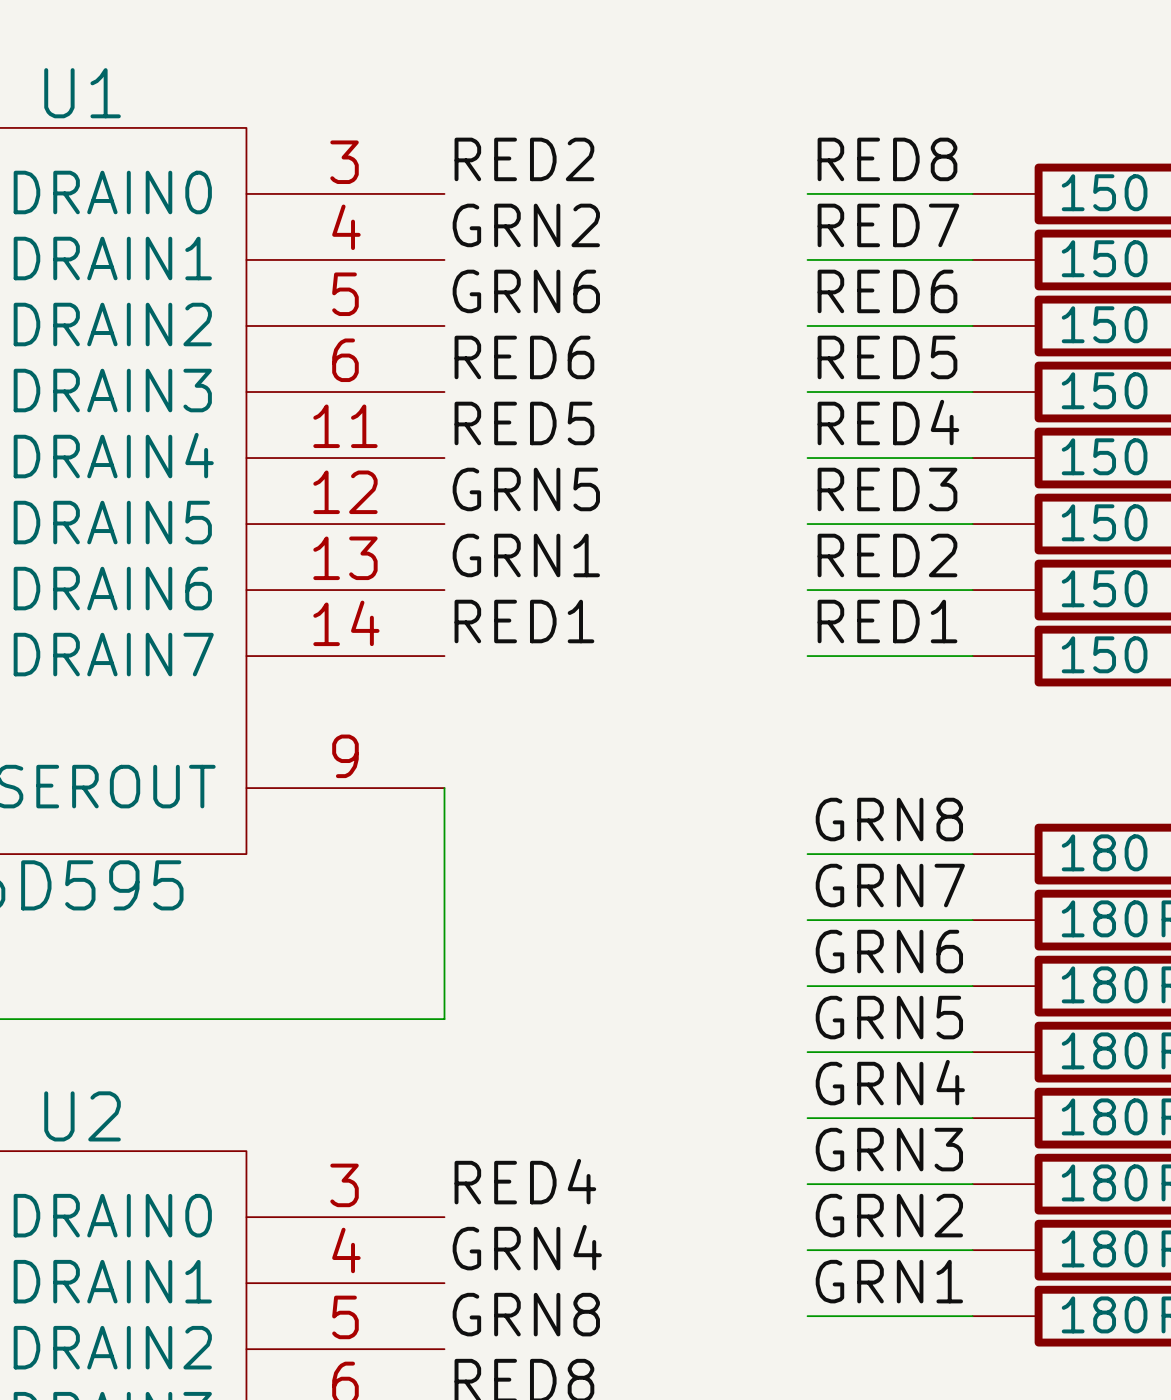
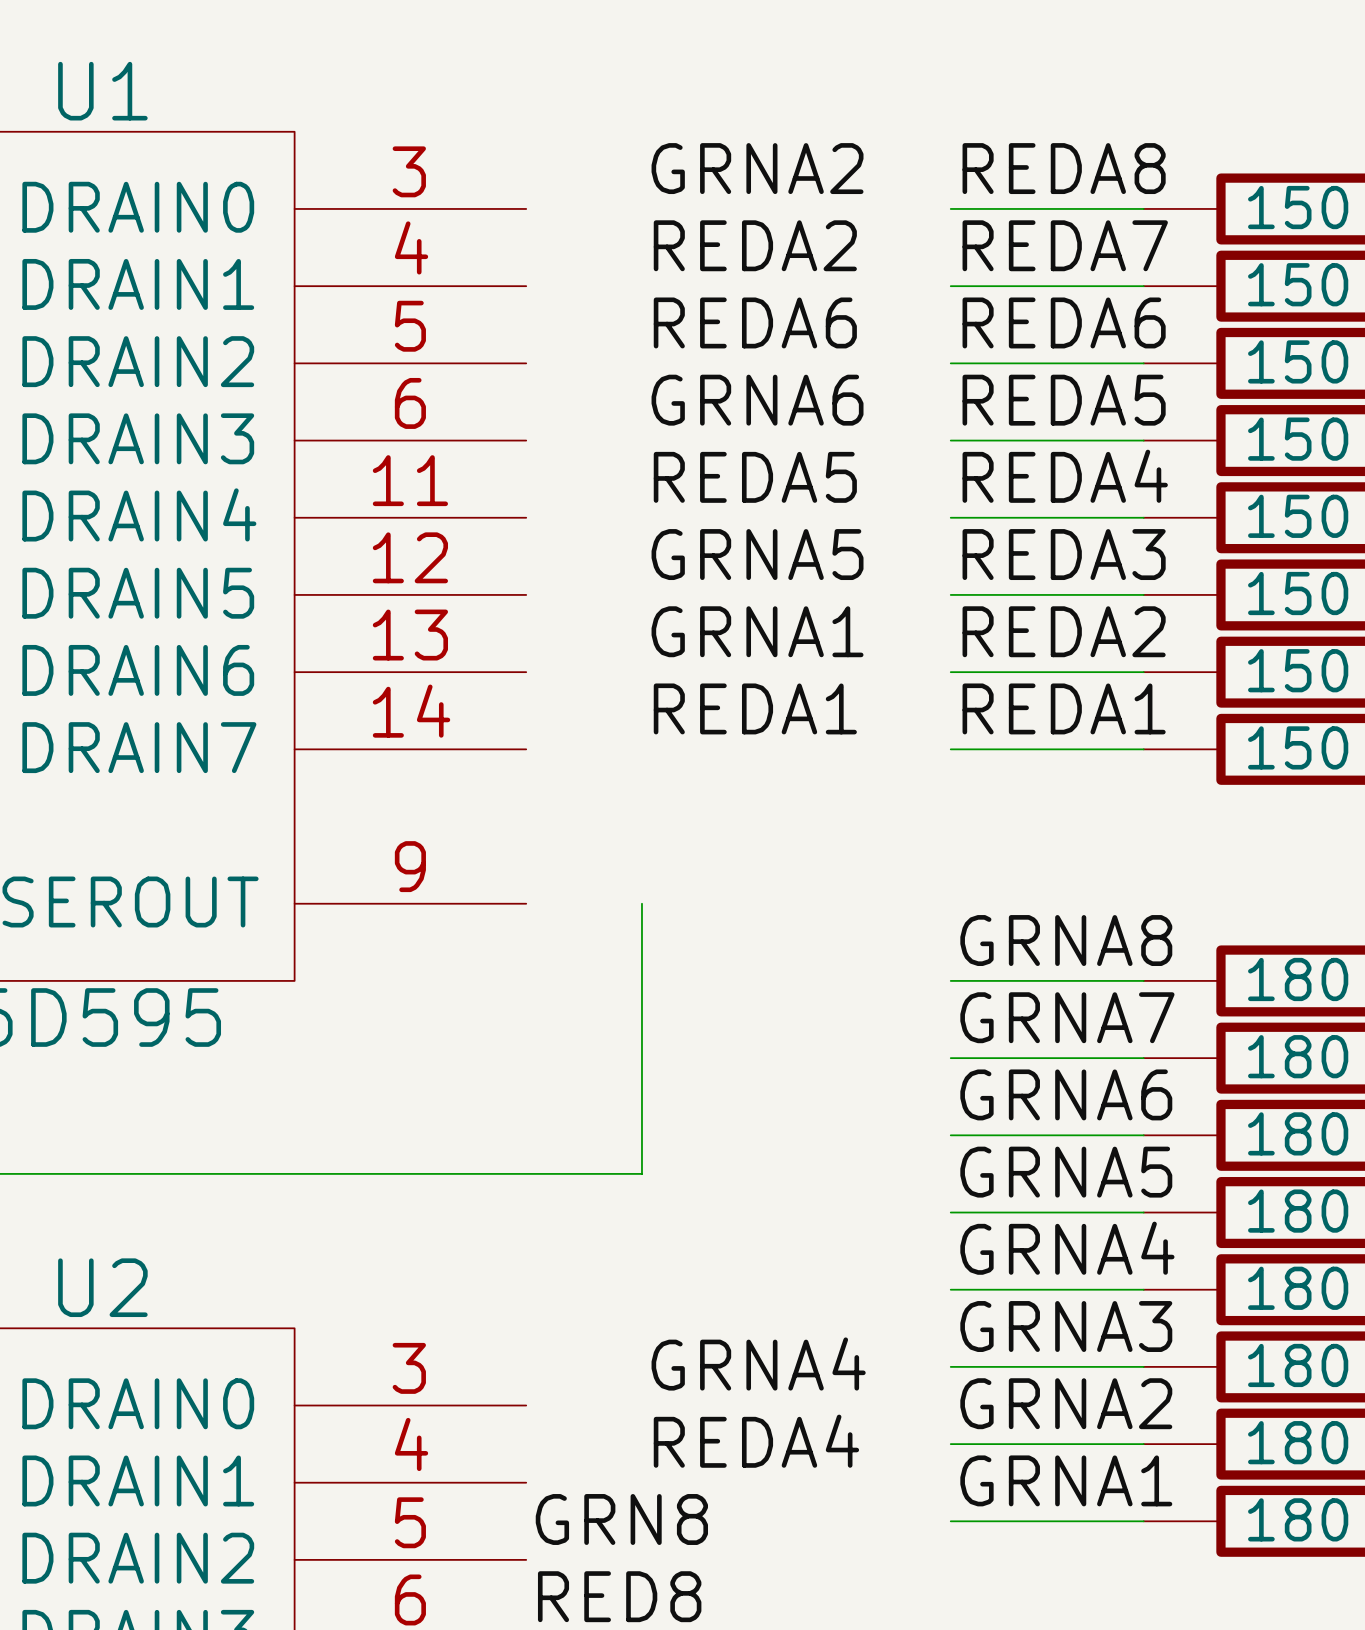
label: RED2 (524, 159) -> REDA2 (755, 245)
label: RED8 (887, 159) -> REDA8 (1064, 168)
label: GRN2 (526, 225) -> GRNA2 (757, 168)
label: RED7 (888, 225) -> REDA7 (1065, 245)
label: GRN6 (526, 291) -> GRNA6 (757, 400)
label: none -> REDA6 (755, 322)
label: RED6 (887, 291) -> REDA6 (1064, 322)
label: RED6 (524, 357) -> none
label: RED5 (887, 357) -> REDA5 (1064, 400)
label: RED4 (888, 422) -> REDA4 (1065, 476)
label: RED5 (524, 423) -> none
label: none -> REDA5 (755, 477)
label: GRN5 (526, 489) -> none
label: none -> GRNA5 (757, 554)
label: RED3 (887, 489) -> REDA3 (1064, 554)
label: GRN1 (526, 555) -> none
label: none -> GRNA1 (757, 631)
label: RED2 (887, 555) -> REDA2 (1064, 631)
label: RED1 (524, 621) -> REDA1 (755, 708)
label: RED1 (887, 621) -> REDA1 (1064, 708)
wire: (444, 788) (444, 1019) -> (641, 903) (641, 1173) (526, 1173)
label: GRN8 (889, 819) -> GRNA8 (1066, 940)
label: GRN7 (890, 885) -> GRNA7 (1067, 1017)
label: GRN6 (889, 951) -> GRNA6 (1066, 1094)
label: GRN5 (889, 1017) -> GRNA5 (1066, 1172)
label: GRN4 (890, 1082) -> GRNA4 (1067, 1248)
label: GRN3 (889, 1149) -> GRNA3 (1066, 1326)
label: RED4 (525, 1181) -> REDA4 (756, 1441)
label: GRN2 (889, 1215) -> GRNA2 (1066, 1403)
label: GRN4 (527, 1247) -> GRNA4 (758, 1364)
label: GRN1 (889, 1281) -> GRNA1 (1066, 1480)

